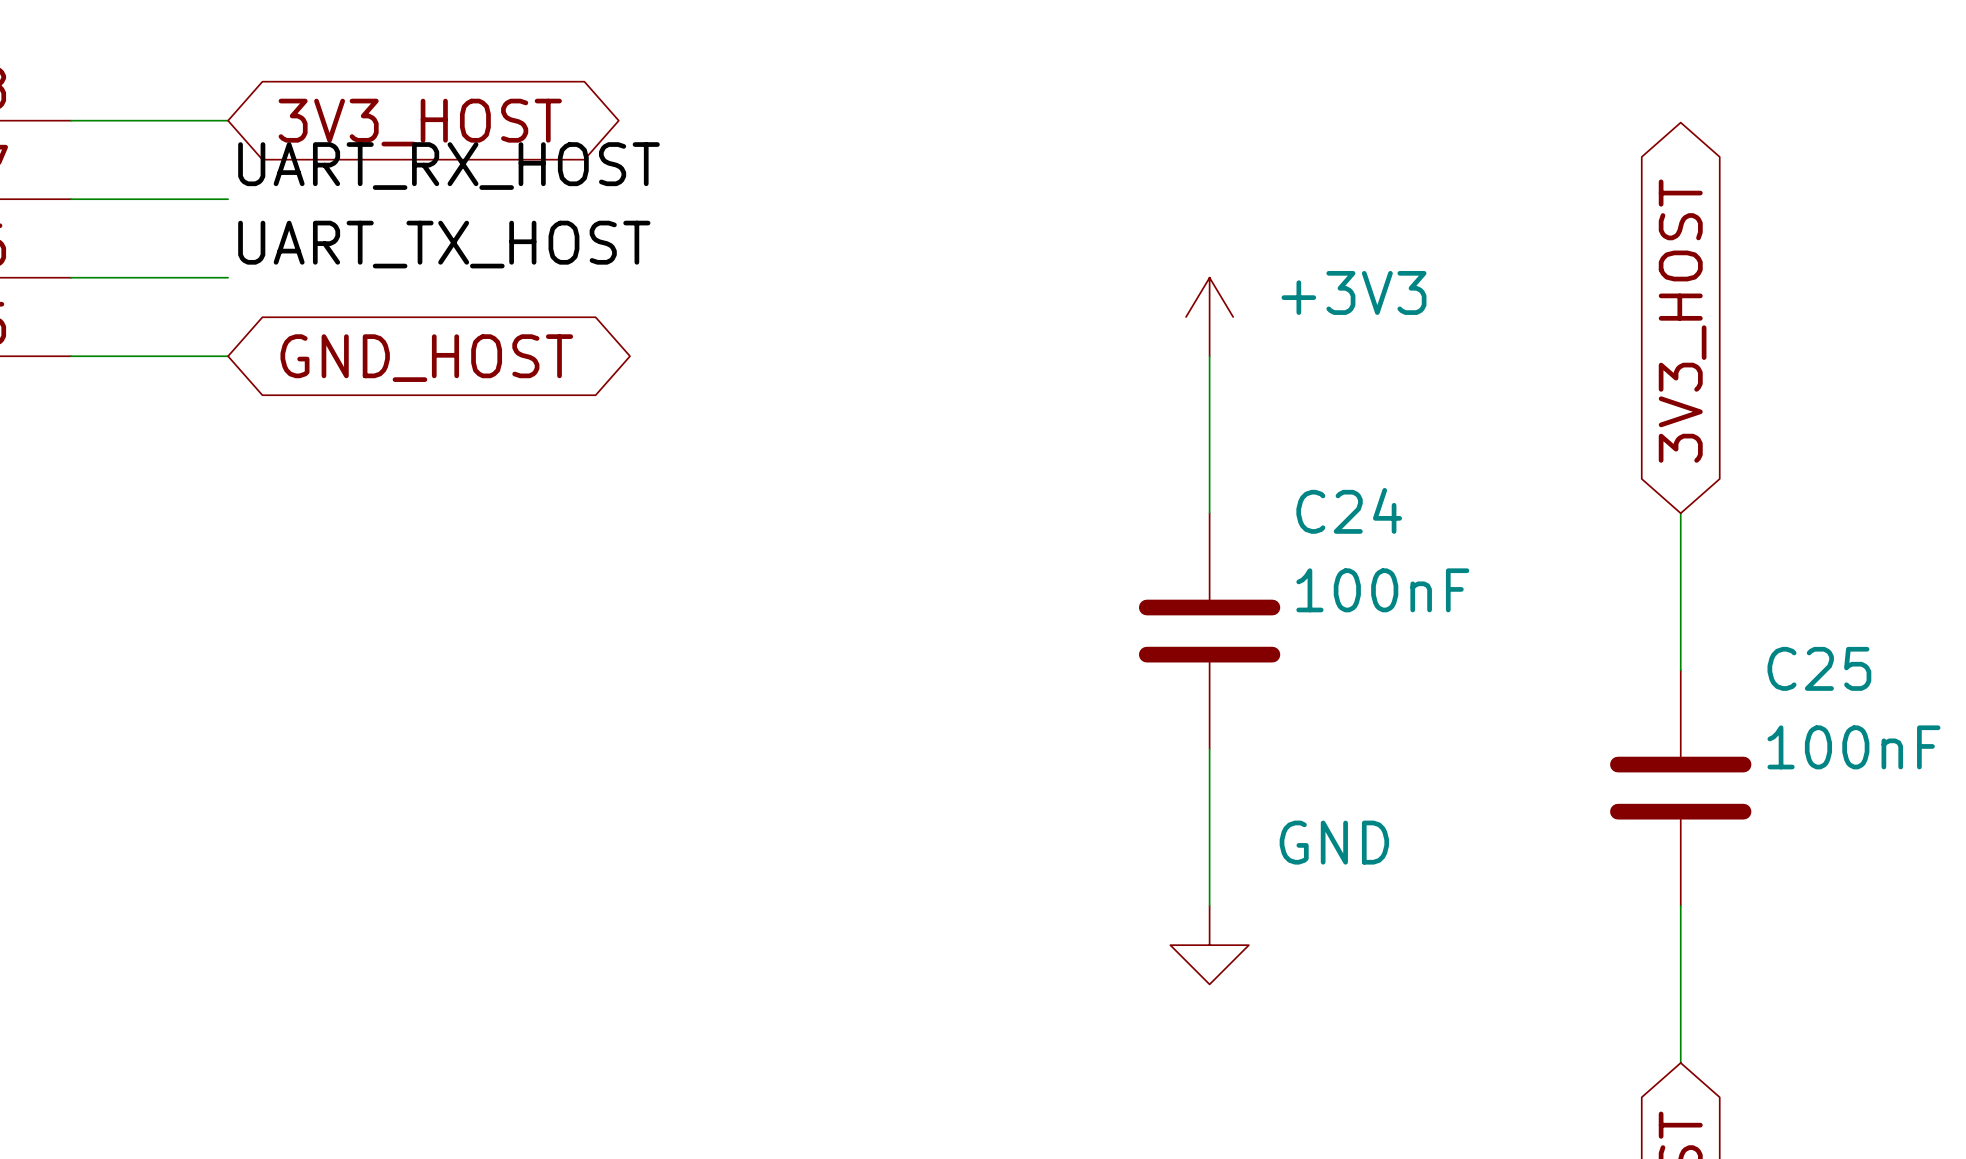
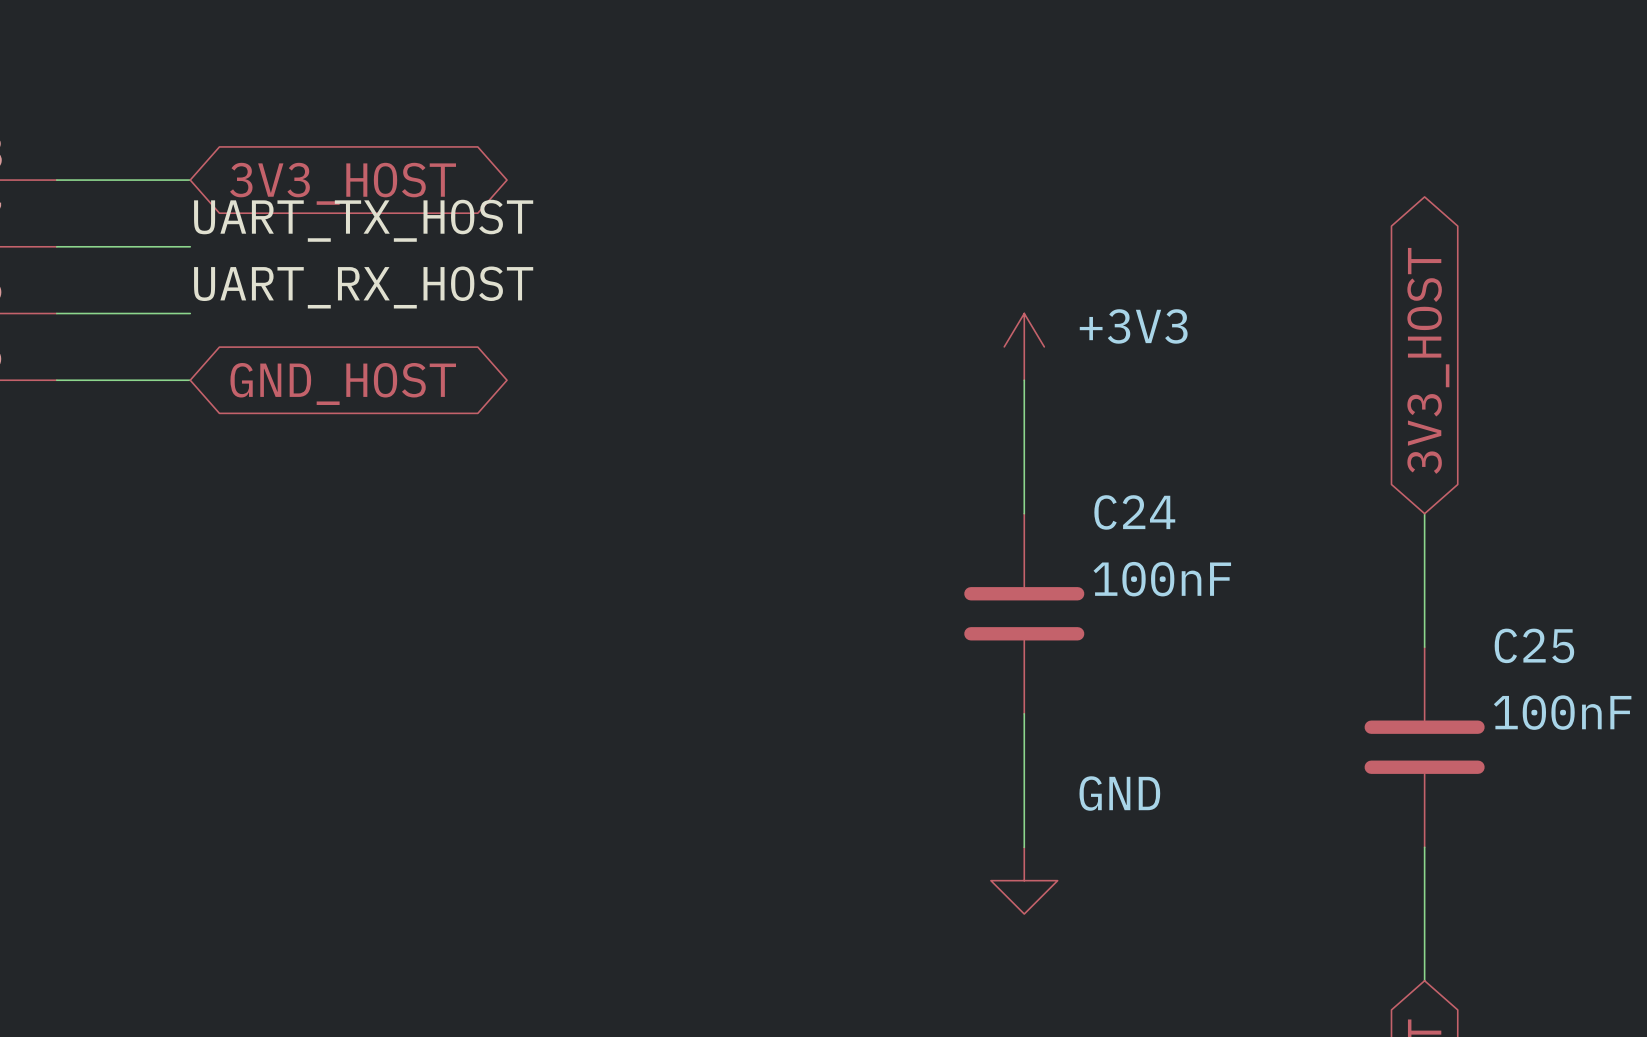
label: UART_RX_HOST (448, 166) -> UART_TX_HOST (363, 220)
label: UART_TX_HOST (444, 244) -> UART_RX_HOST (363, 287)

